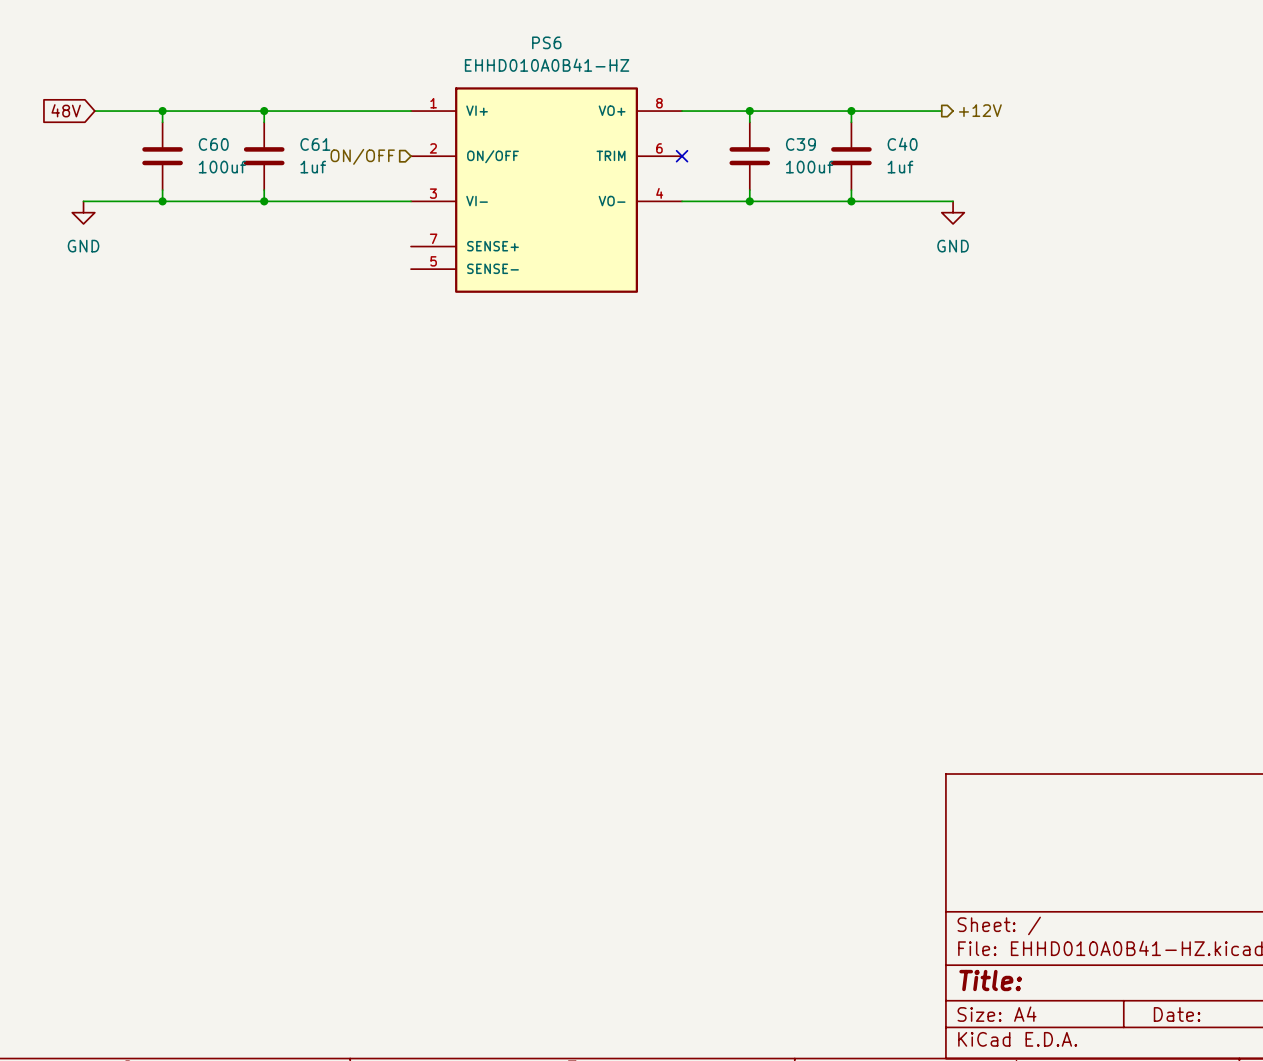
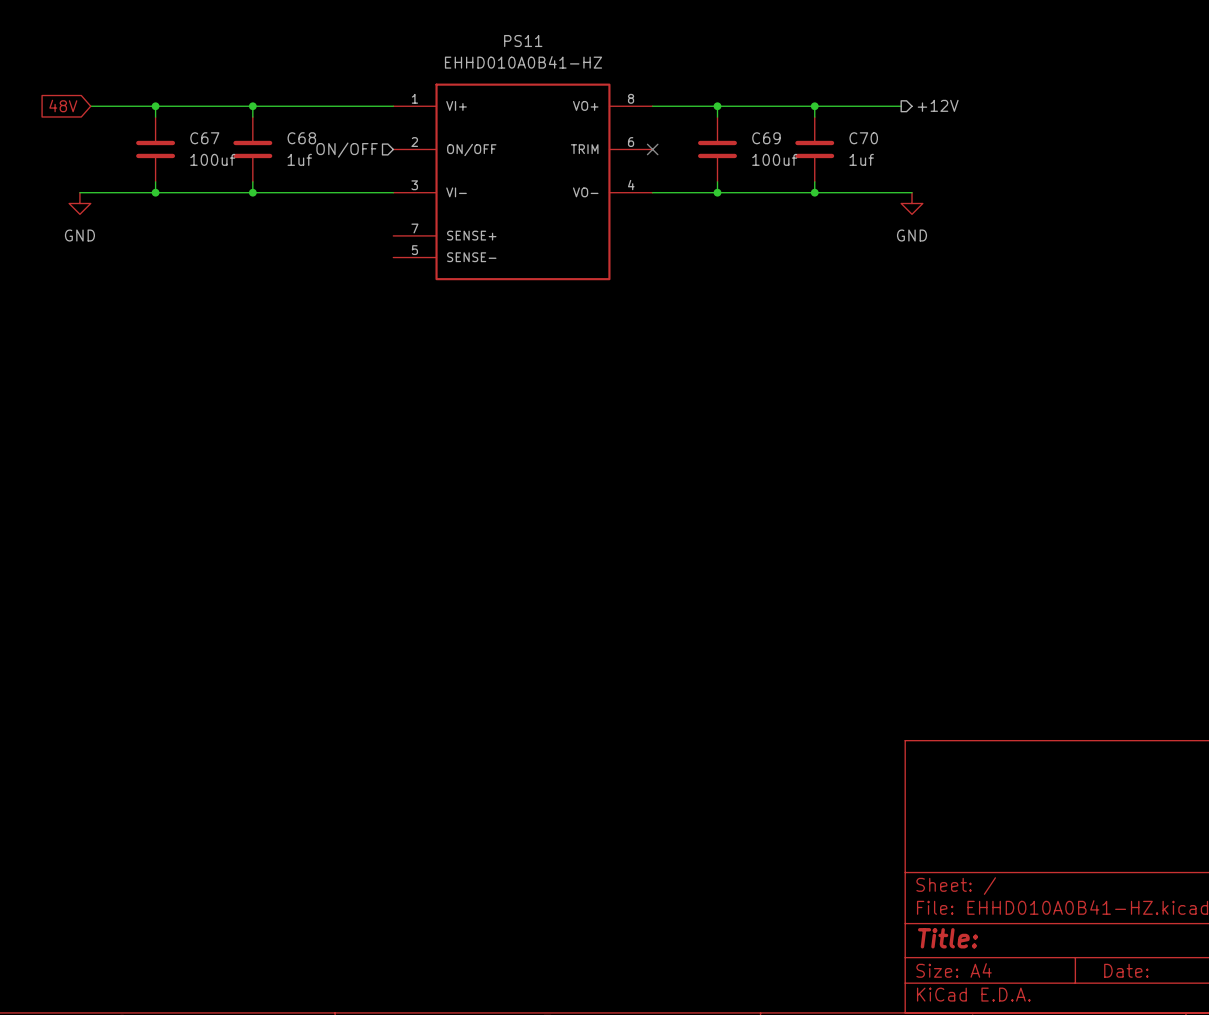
PS6 name: PS6 (546, 42) -> PS11 (523, 41)
C60 name: C60 (213, 144) -> C67 (204, 138)
C61 name: C61 (315, 144) -> C68 (301, 138)
C39 name: C39 (800, 144) -> C69 (766, 138)
C40 name: C40 (902, 144) -> C70 (863, 138)

